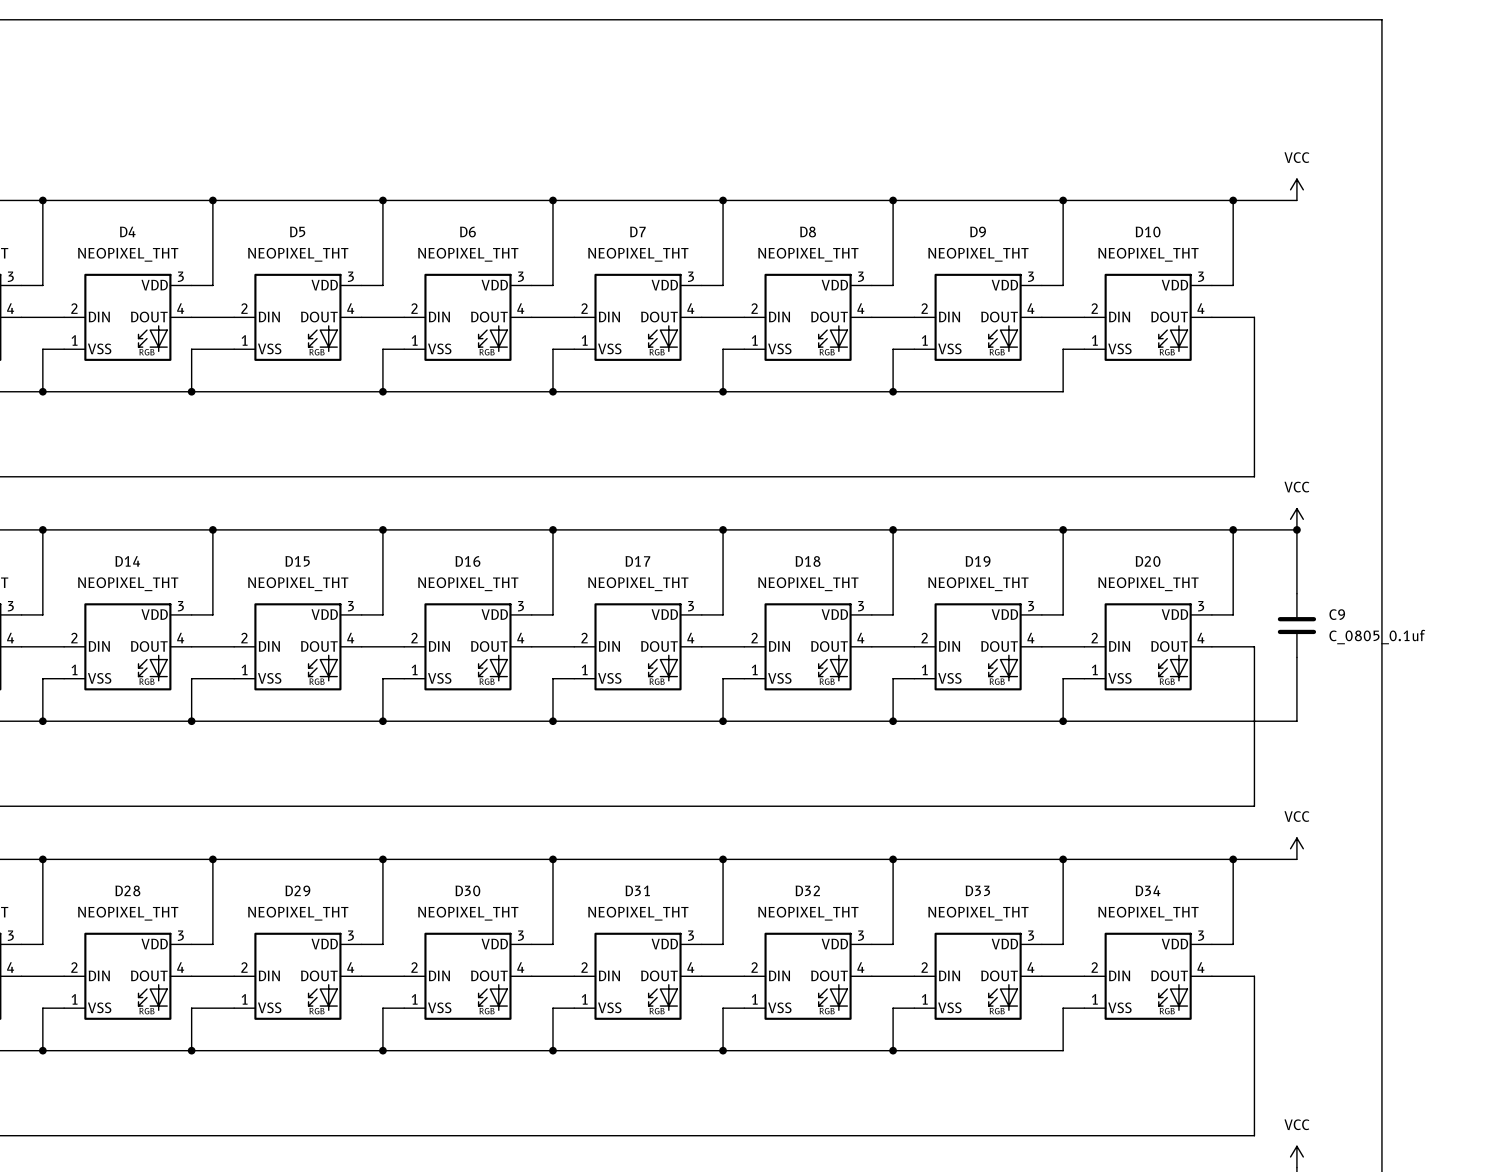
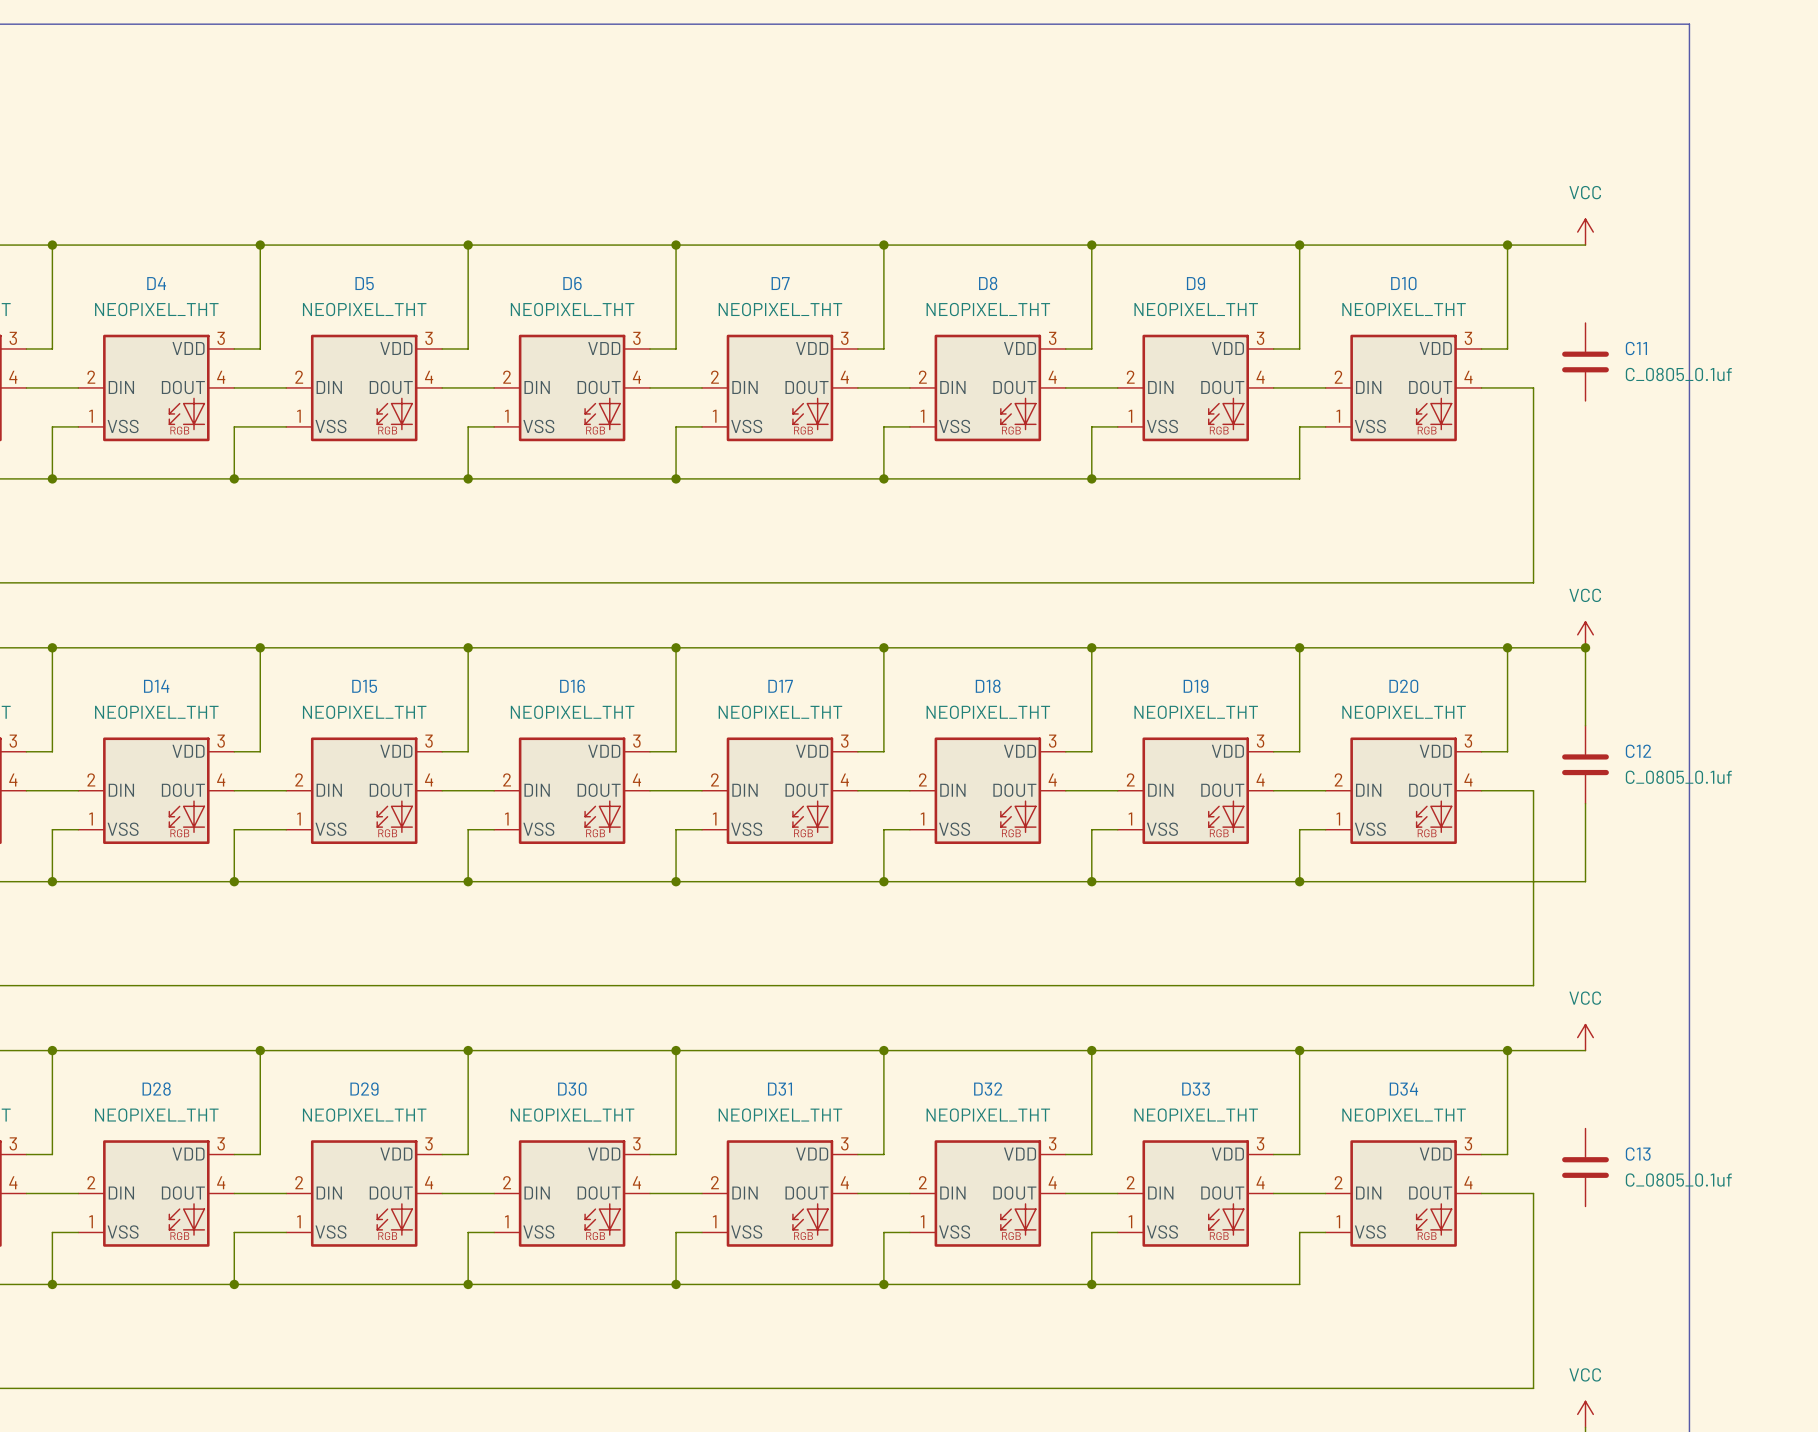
C11: none -> C_0805_0.1uf (1585, 361)
C9 name: C9 (1337, 614) -> C12 (1638, 751)
C13: none -> C_0805_0.1uf (1585, 1167)

